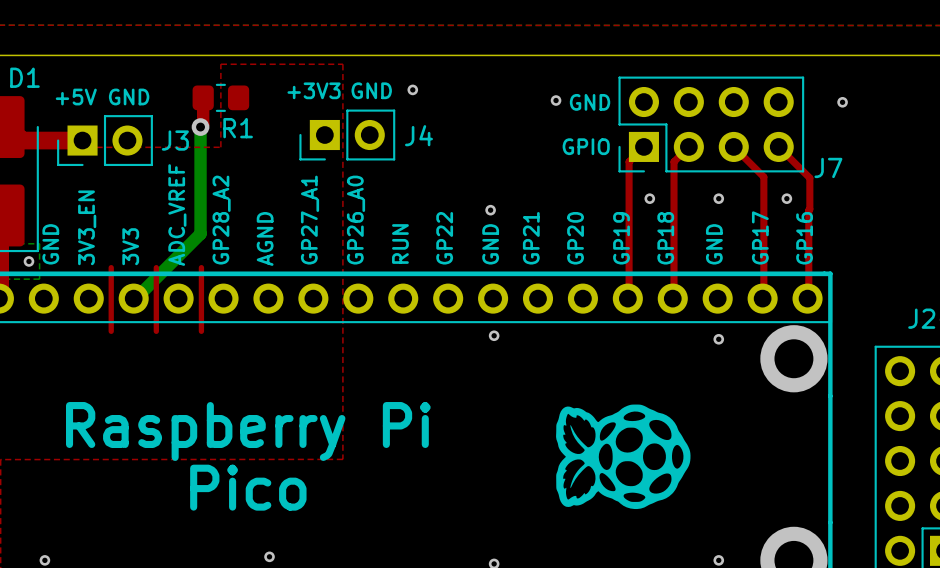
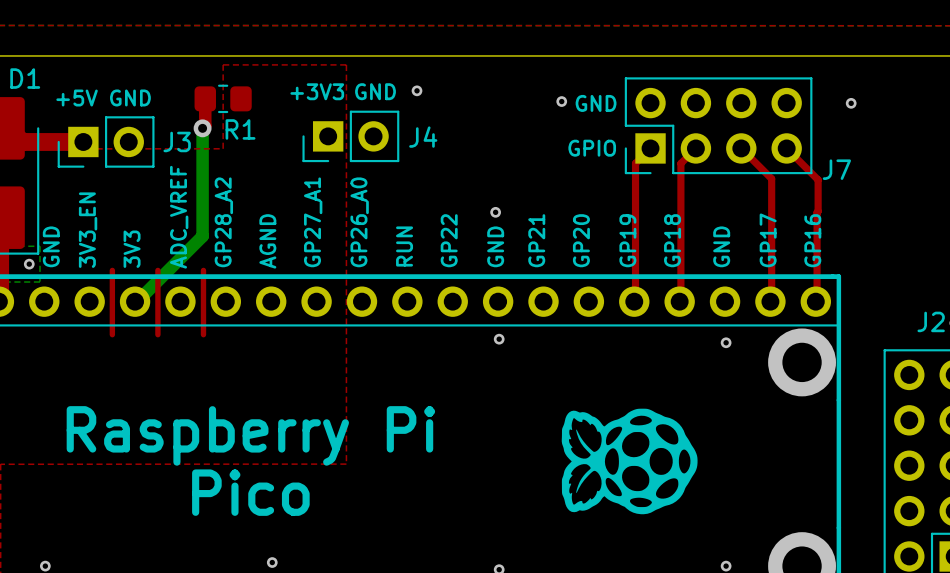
via: (649, 198) -> none
via: (718, 198) -> none
via: (786, 198) -> none

